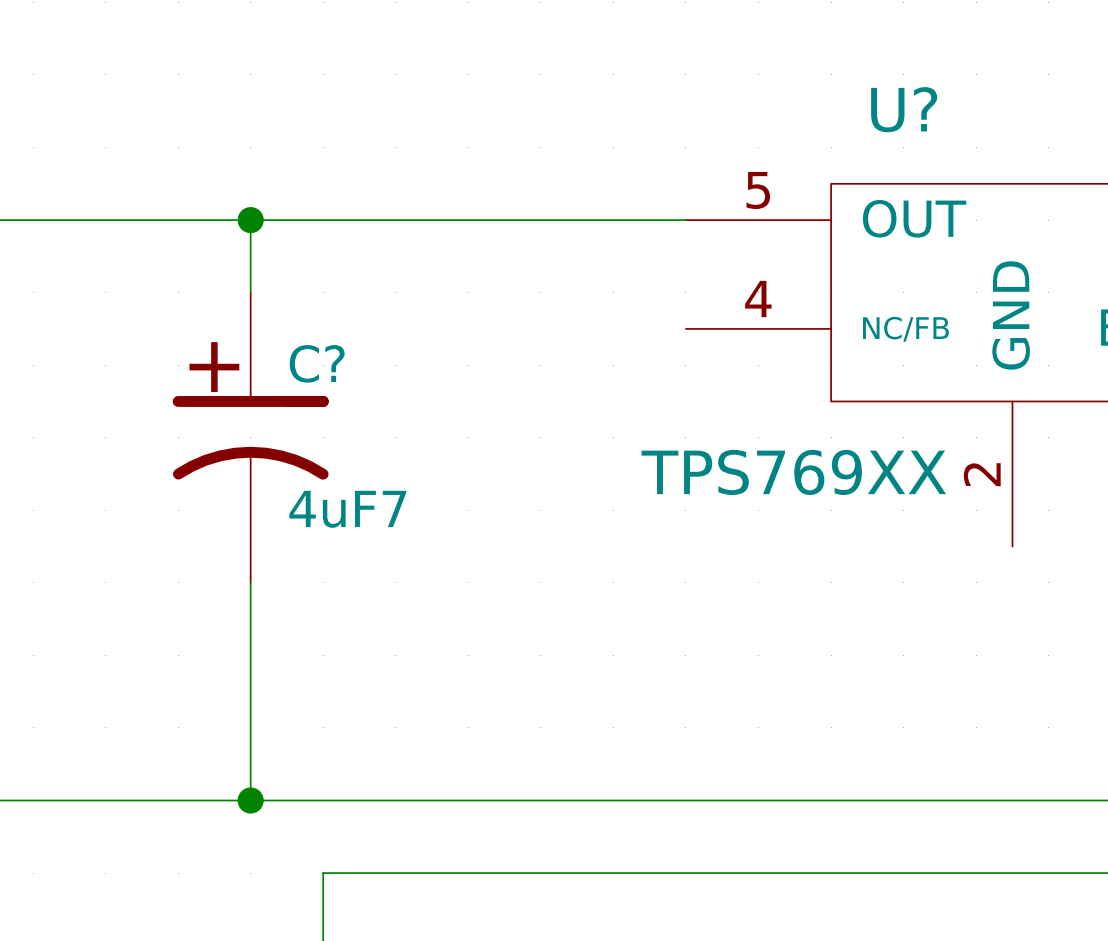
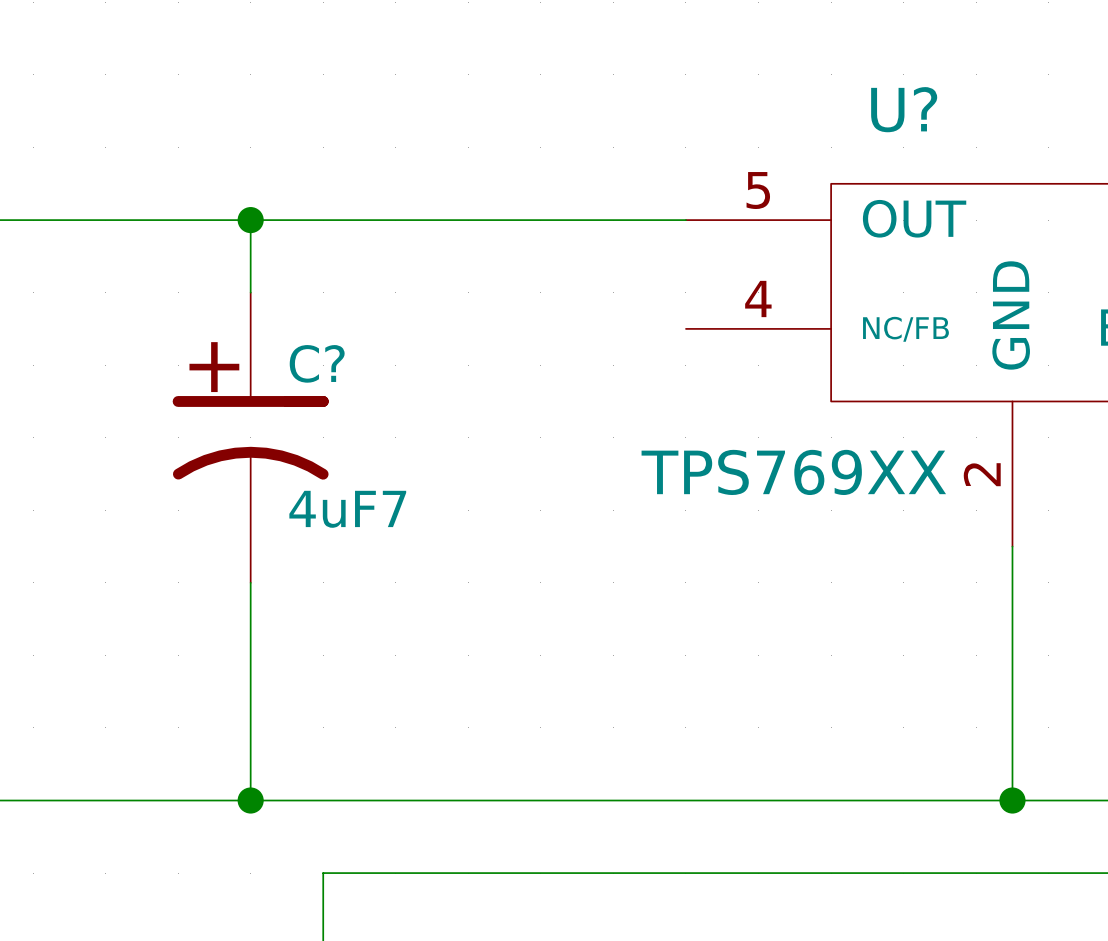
wire: none -> (1012, 546) (1012, 800)
junction: none -> (1012, 800)

